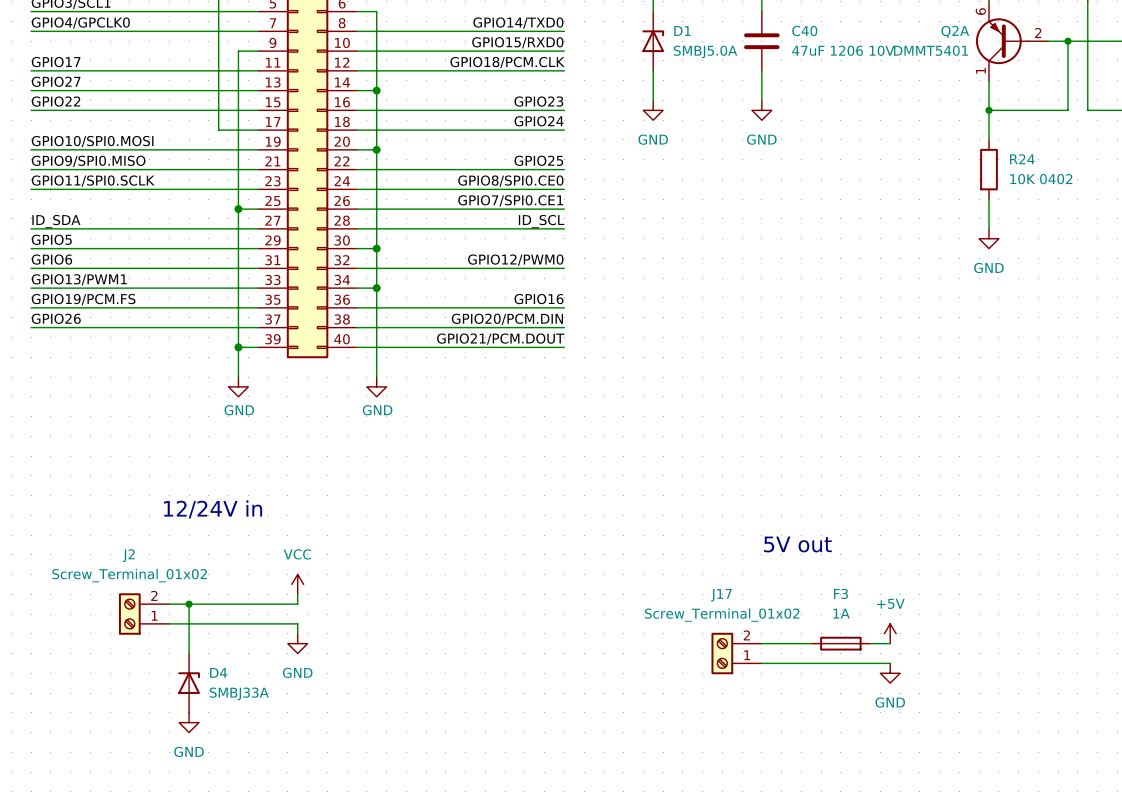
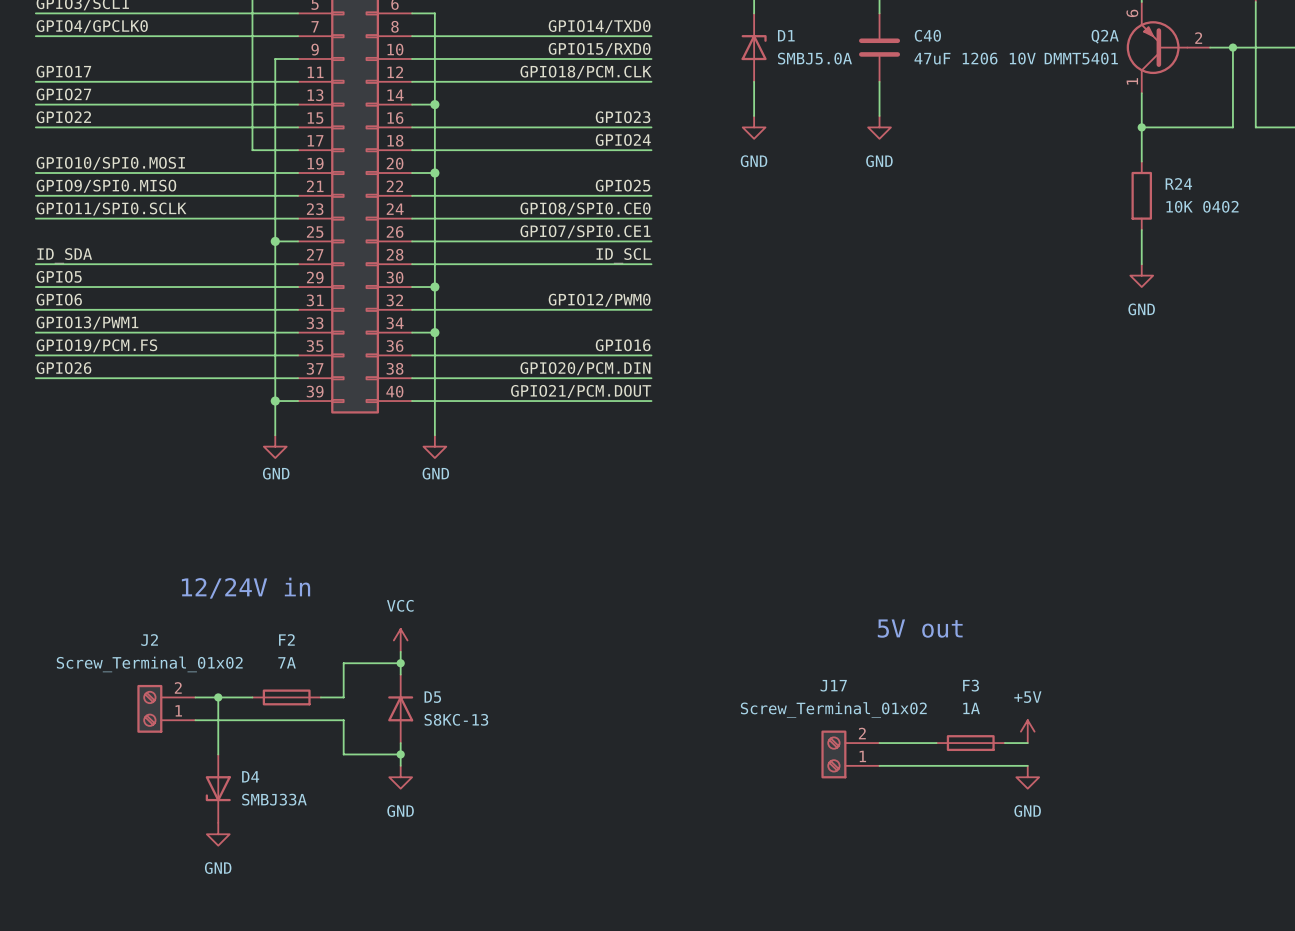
wire: none -> (400, 651) (400, 674)
wire: none -> (400, 663) (343, 663) (343, 686)
junction: none -> (400, 663)
power symbol position: VCC (297, 584) -> VCC (400, 640)
F2: none -> 7A (286, 697)
D5: none -> S8KC-13 (400, 708)
wire: none -> (343, 731) (343, 754) (400, 754)
power symbol position: GND (297, 643) -> GND (400, 777)
wire: none -> (400, 743) (400, 765)
junction: none -> (400, 754)
D4 rotation: 0° (189, 683) -> 180° (218, 788)

